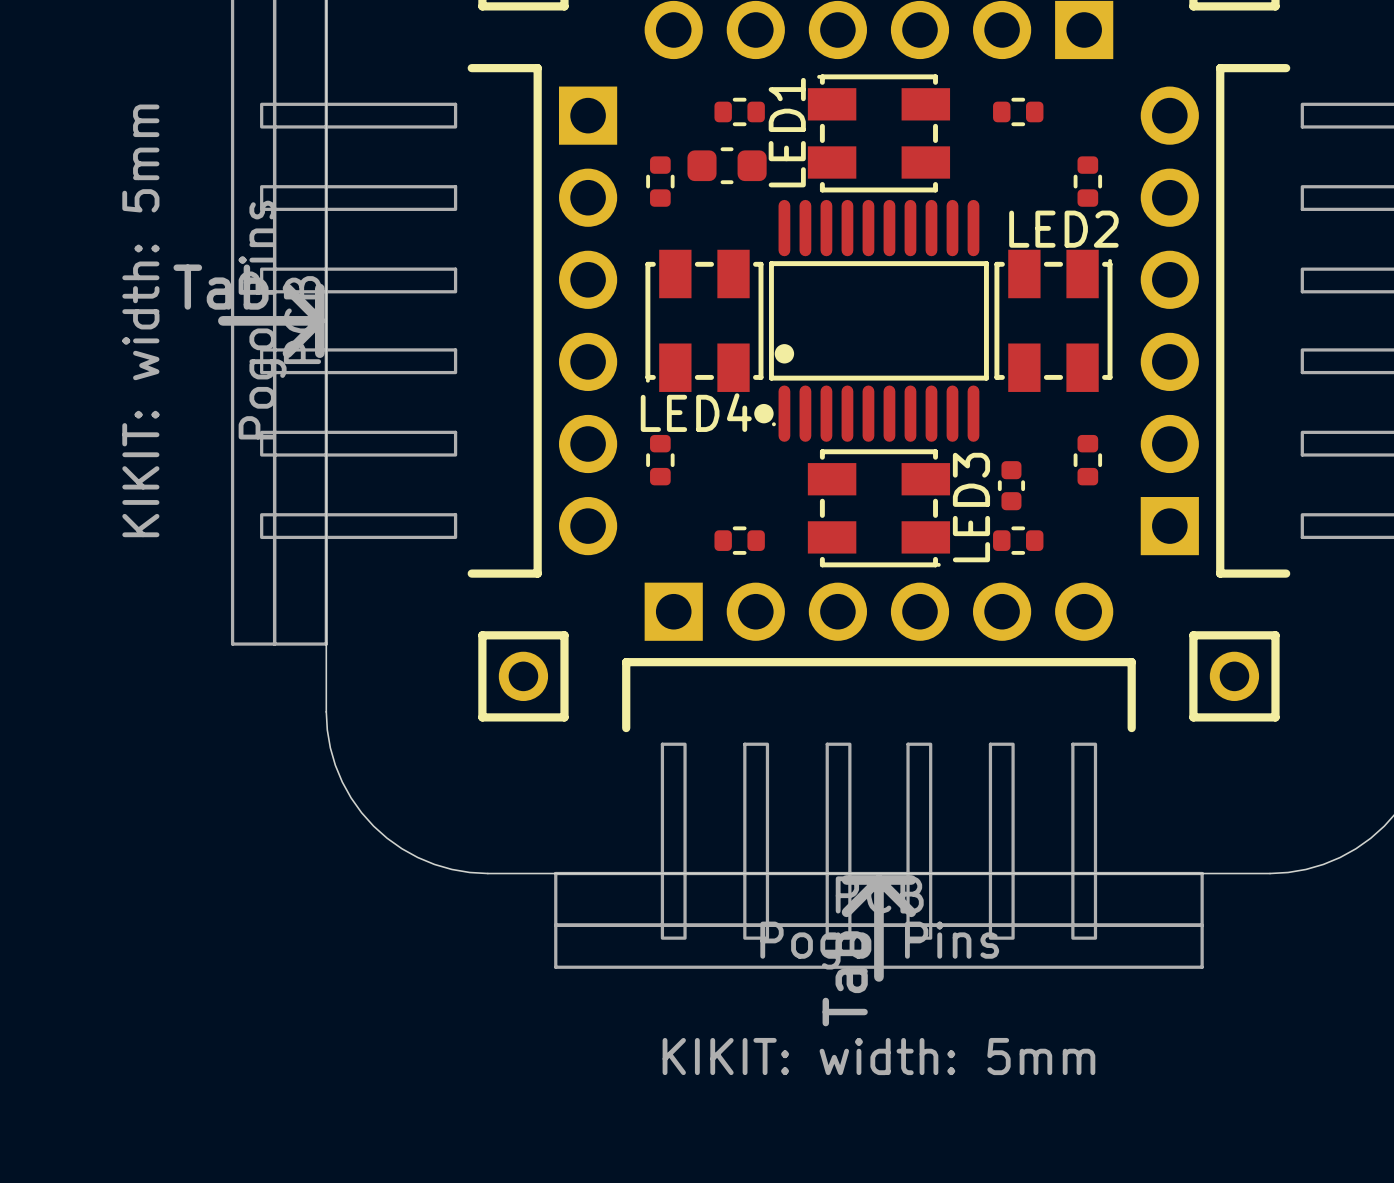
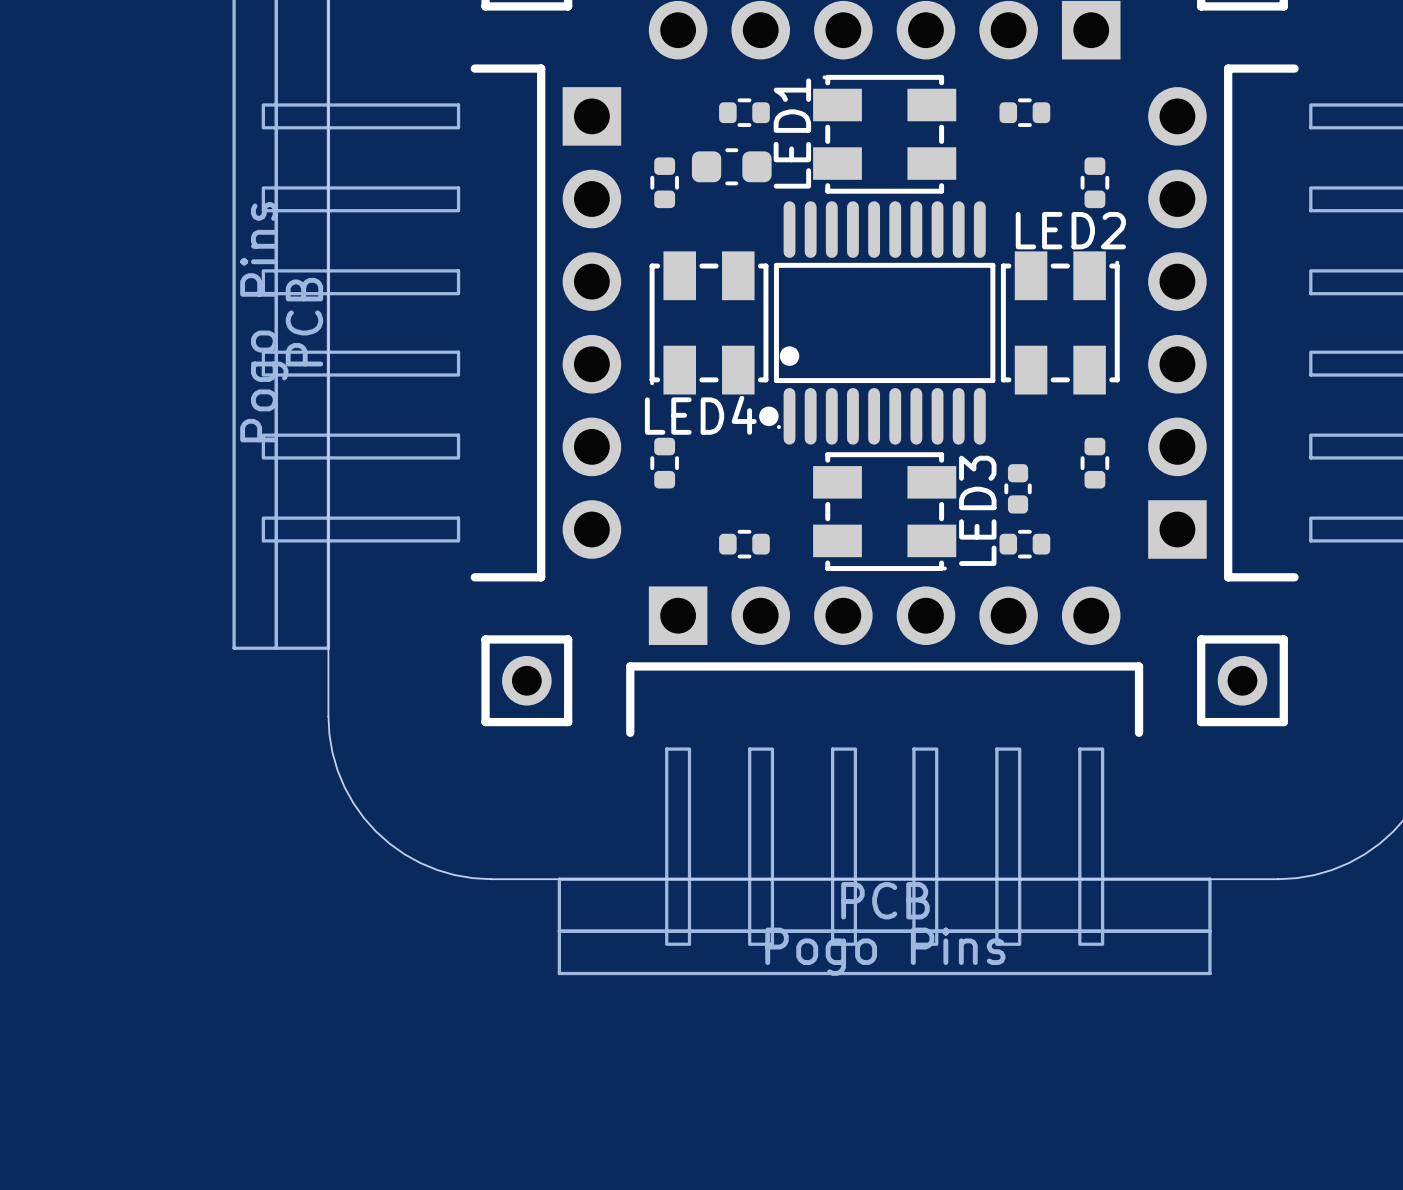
drawing: [218, 283, 325, 359] -> none
drawing: [841, 875, 917, 982] -> none

